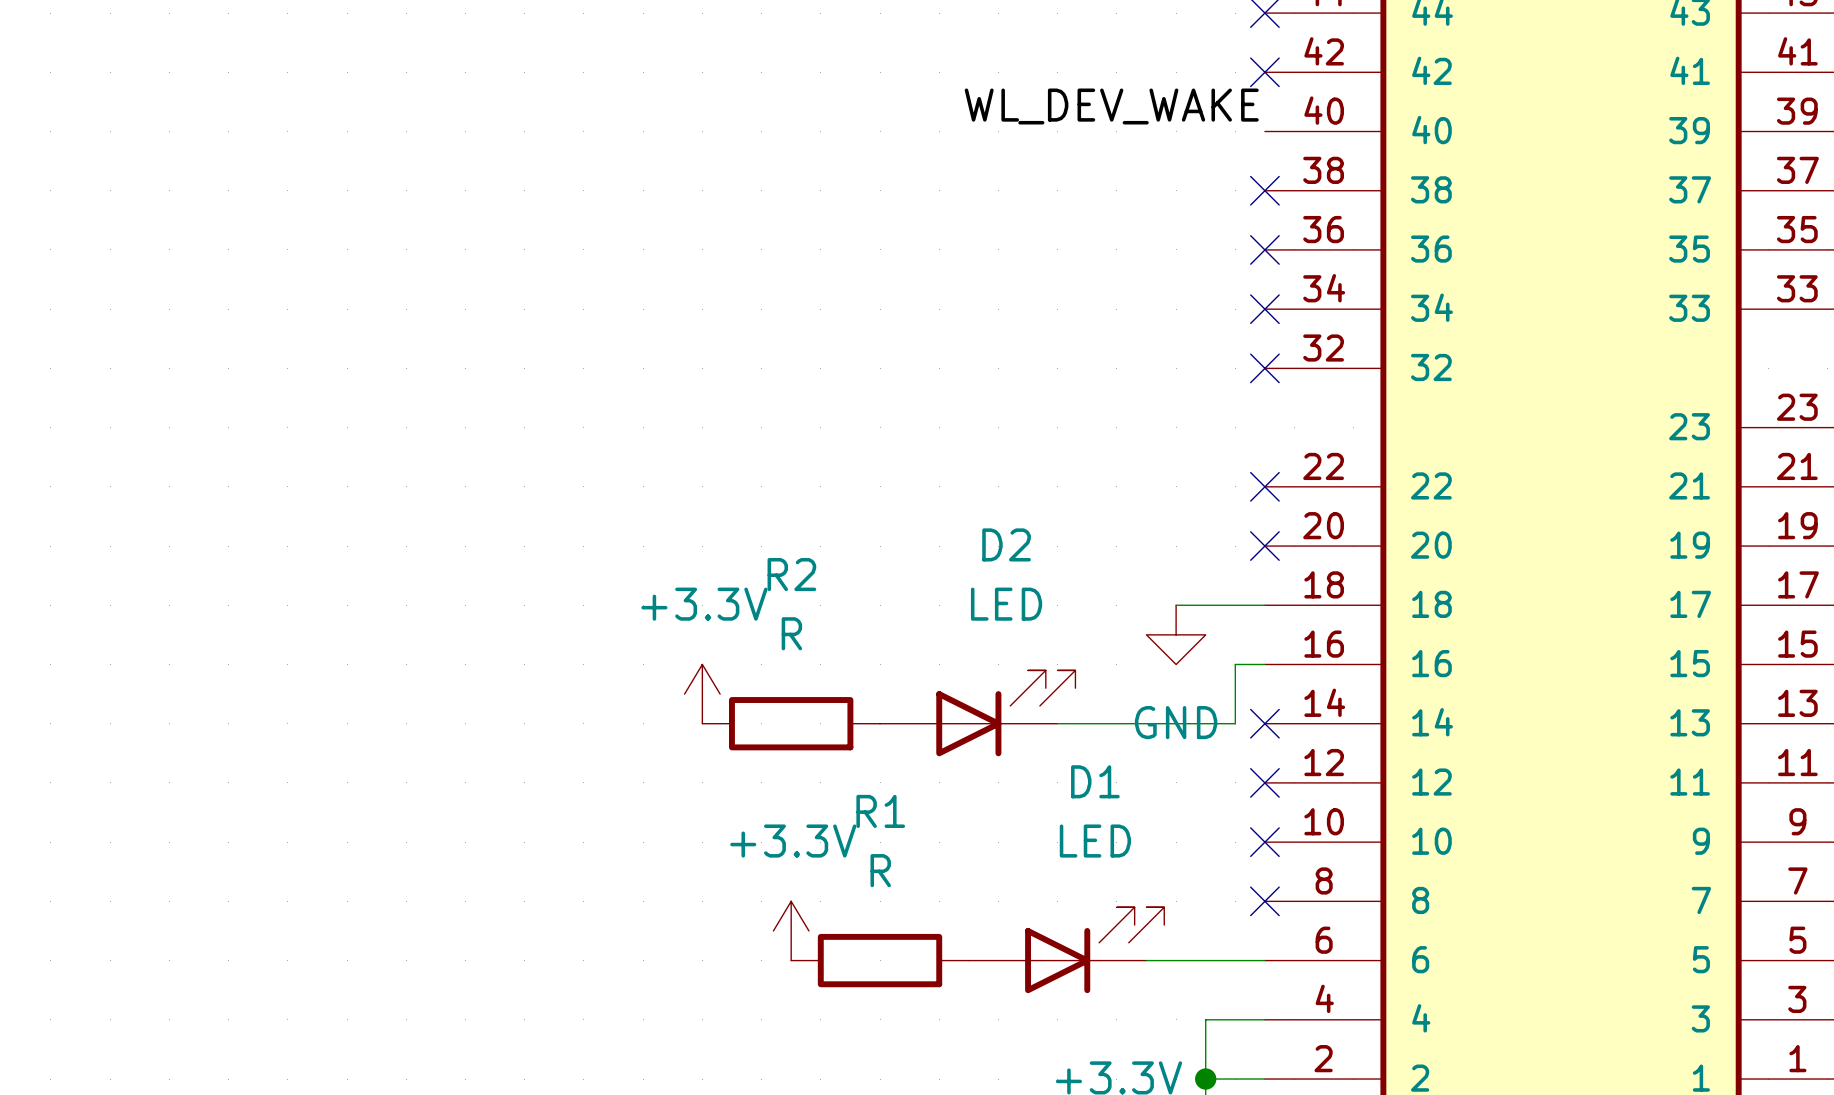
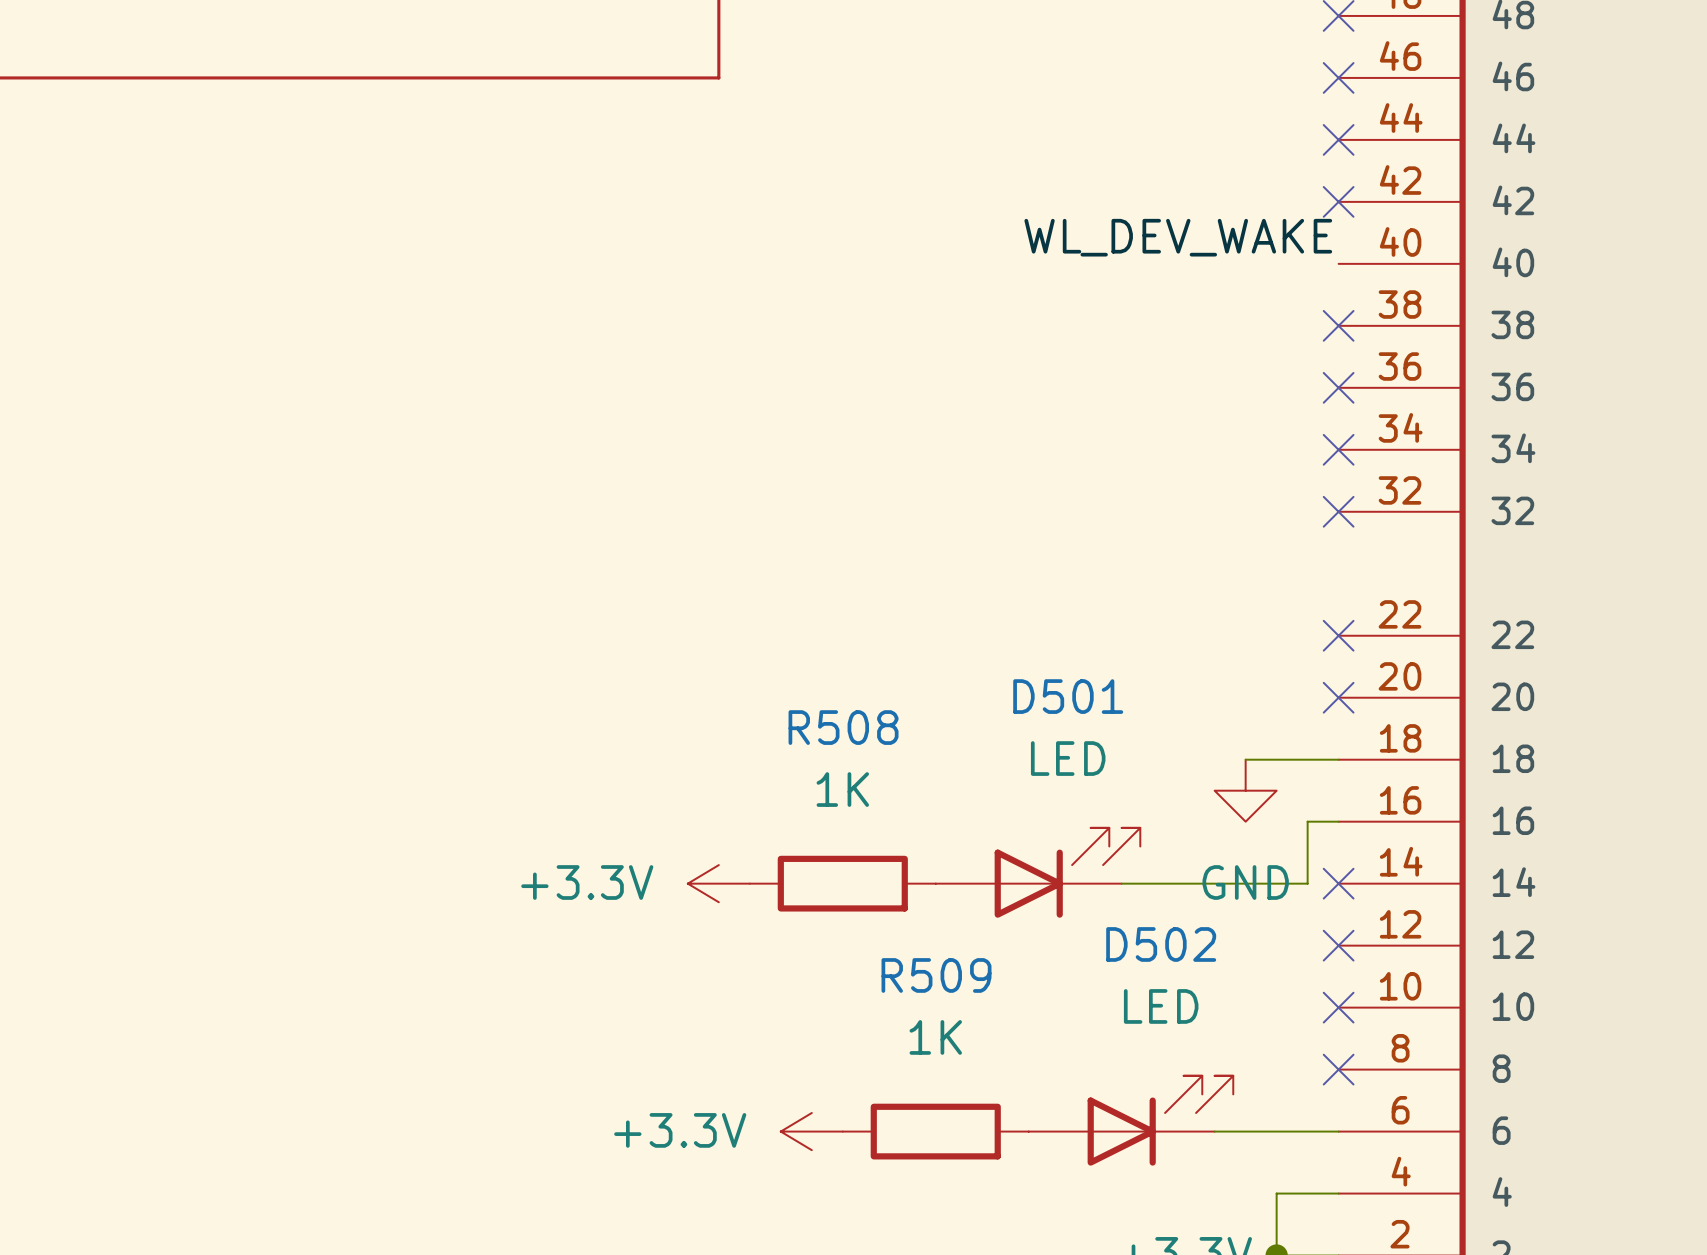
D2 name: D2 (1006, 544) -> D501 (1068, 696)
R2 name: R2 (791, 574) -> R508 (843, 727)
power symbol text position: +3.3V (704, 604) -> +3.3V (587, 882)
R2 value: R (791, 633) -> 1K (842, 789)
power symbol rotation: 0° (702, 694) -> 90° counterclockwise (718, 883)
power symbol position: +3.3V (702, 694) -> +3.3V (718, 883)
D1 name: D1 (1095, 781) -> D502 (1161, 944)
R1 name: R1 (880, 811) -> R509 (936, 975)
power symbol text position: +3.3V (793, 841) -> +3.3V (680, 1130)
R1 value: R (880, 870) -> 1K (935, 1037)
power symbol rotation: 0° (791, 930) -> 90° counterclockwise (811, 1131)
power symbol position: +3.3V (791, 930) -> +3.3V (811, 1131)

